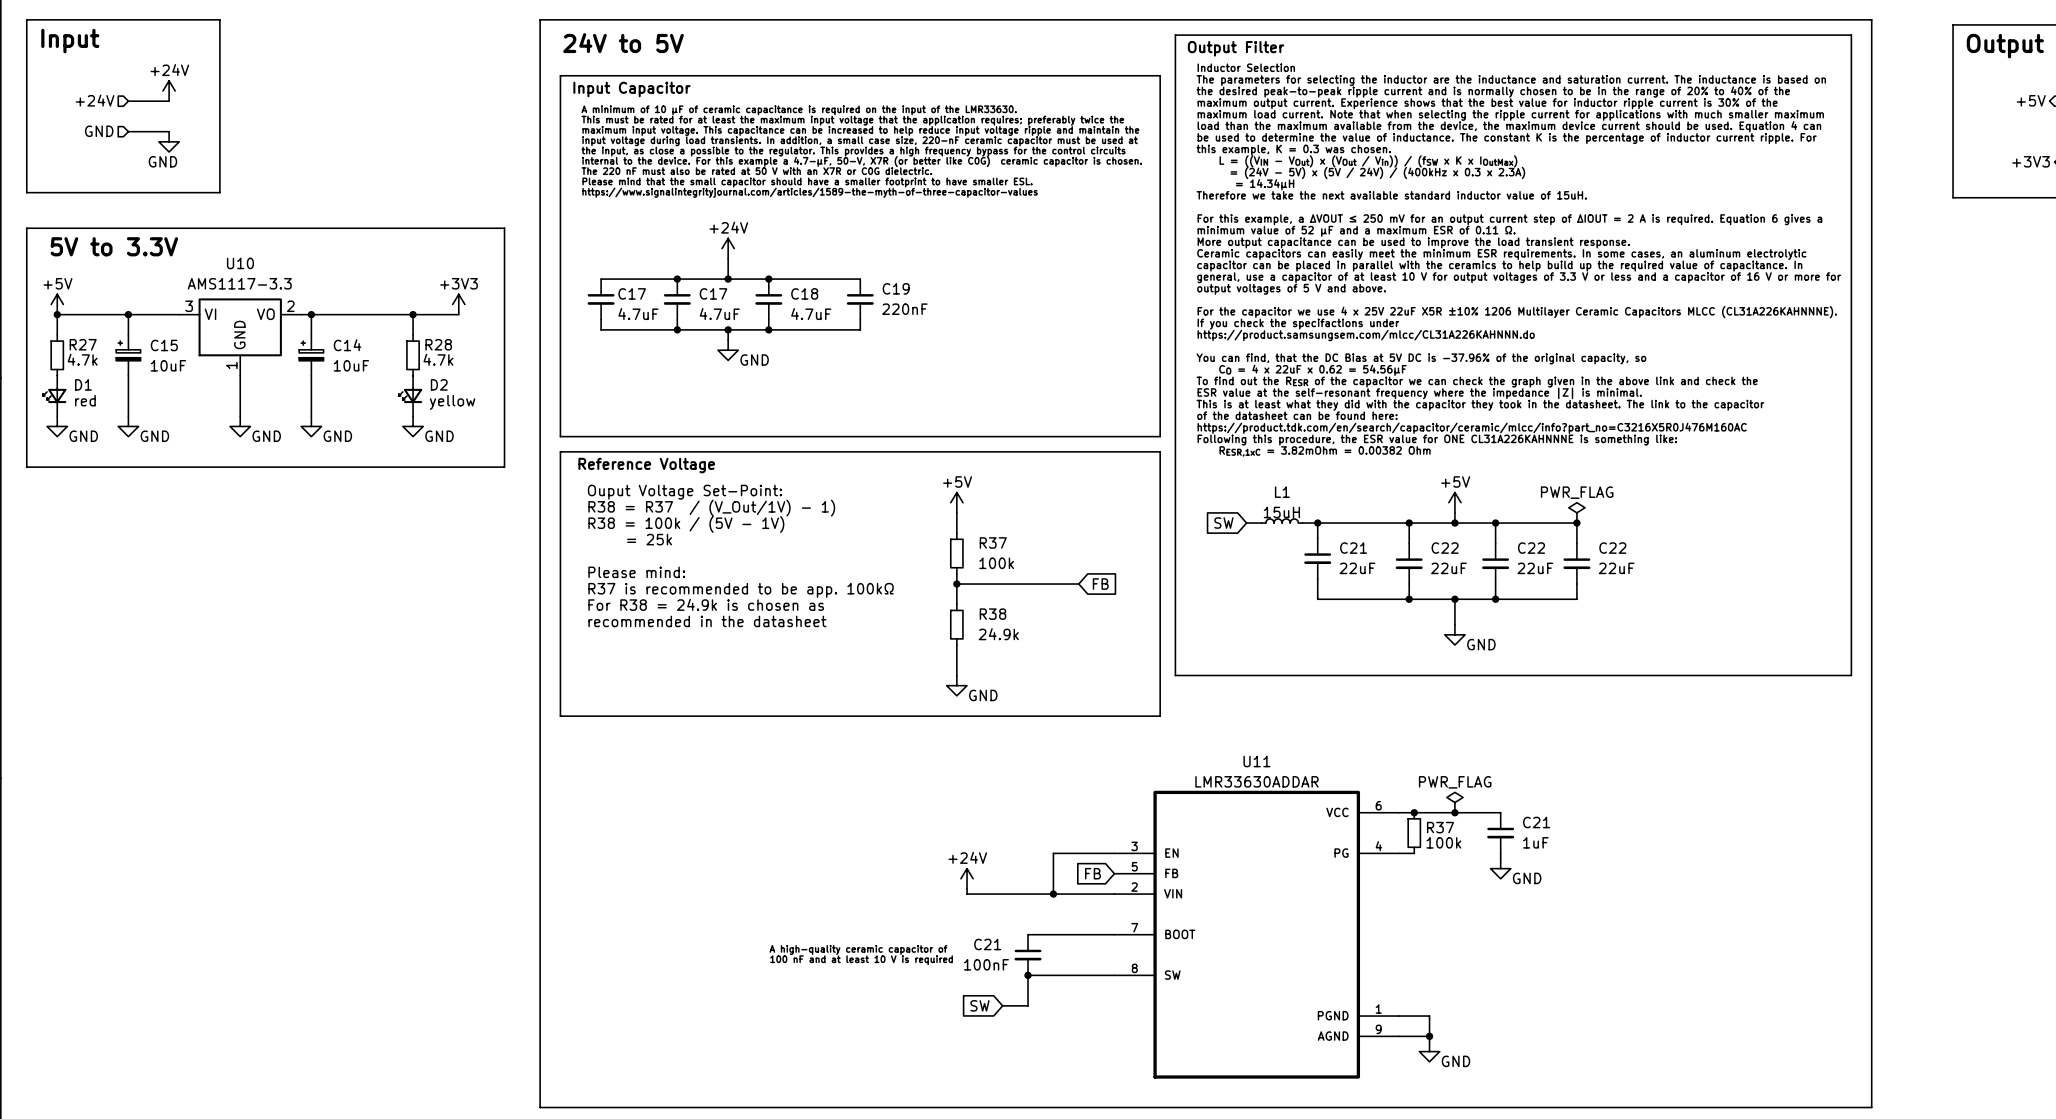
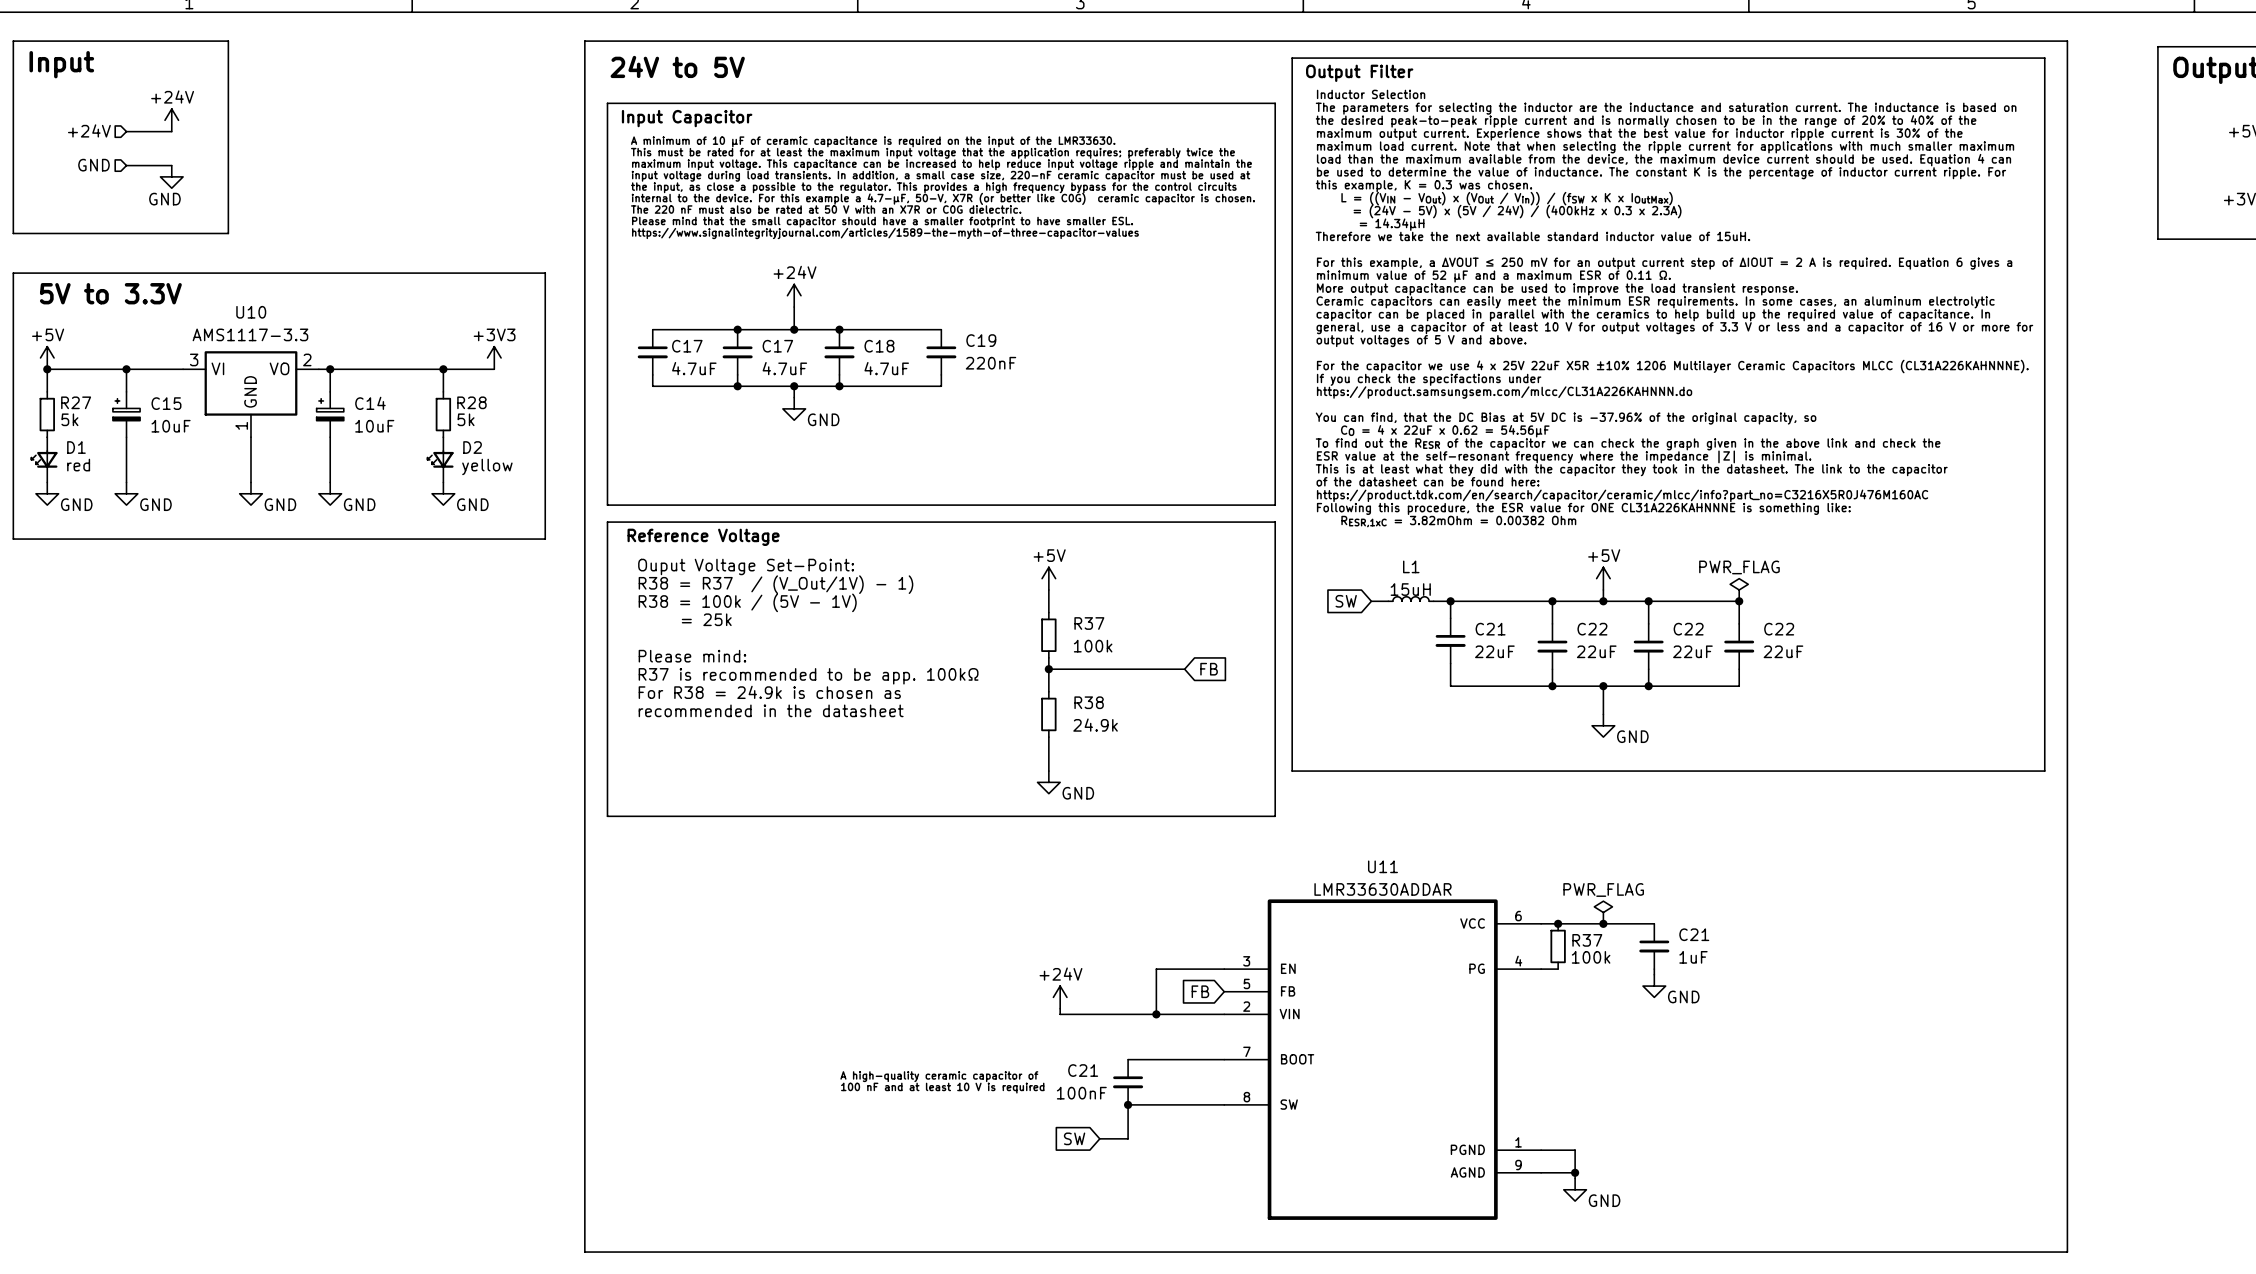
R27 value: 4.7k (82, 359) -> 5k (69, 419)
R28 value: 4.7k (438, 359) -> 5k (466, 419)

